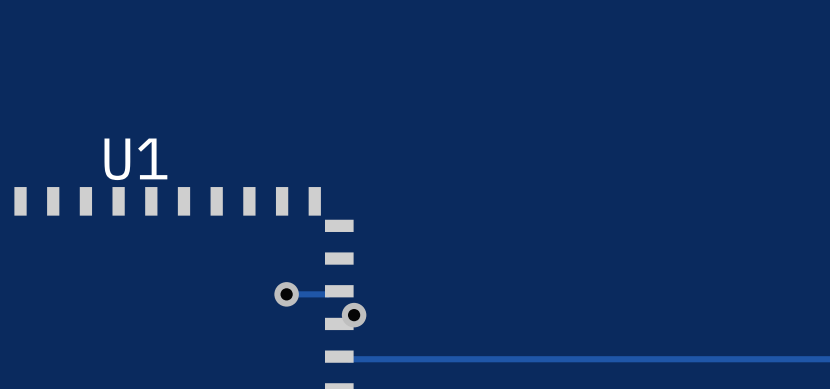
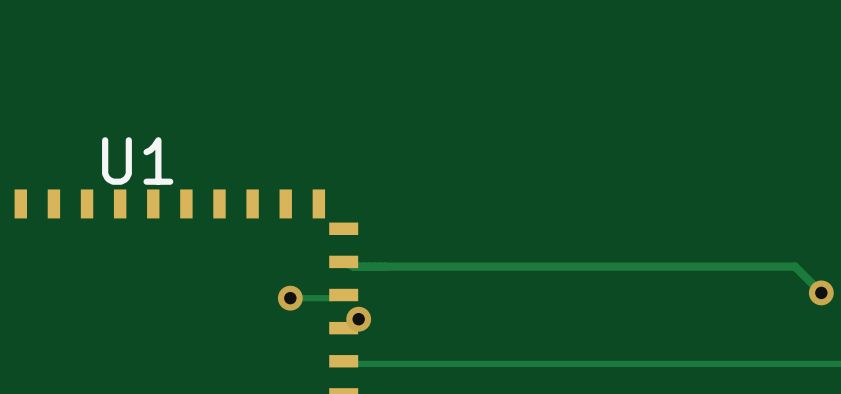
track: none -> (343, 261) (353, 266) (795, 266) (821, 292)
via: none -> (821, 292)

